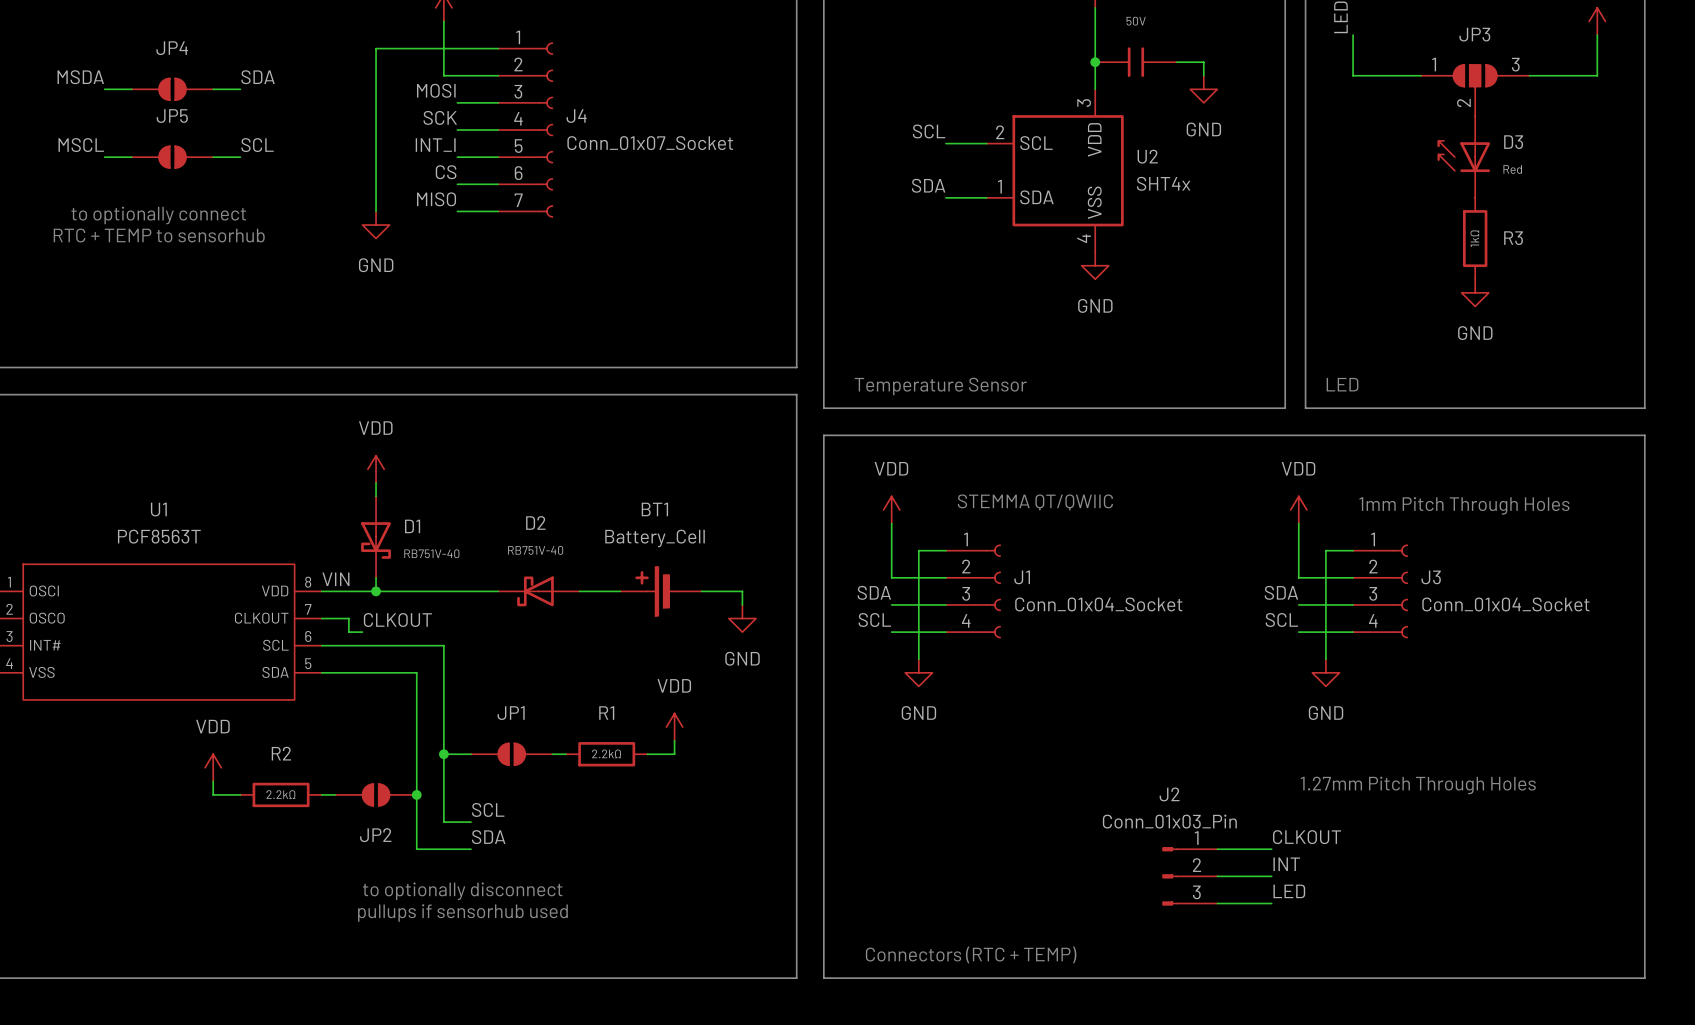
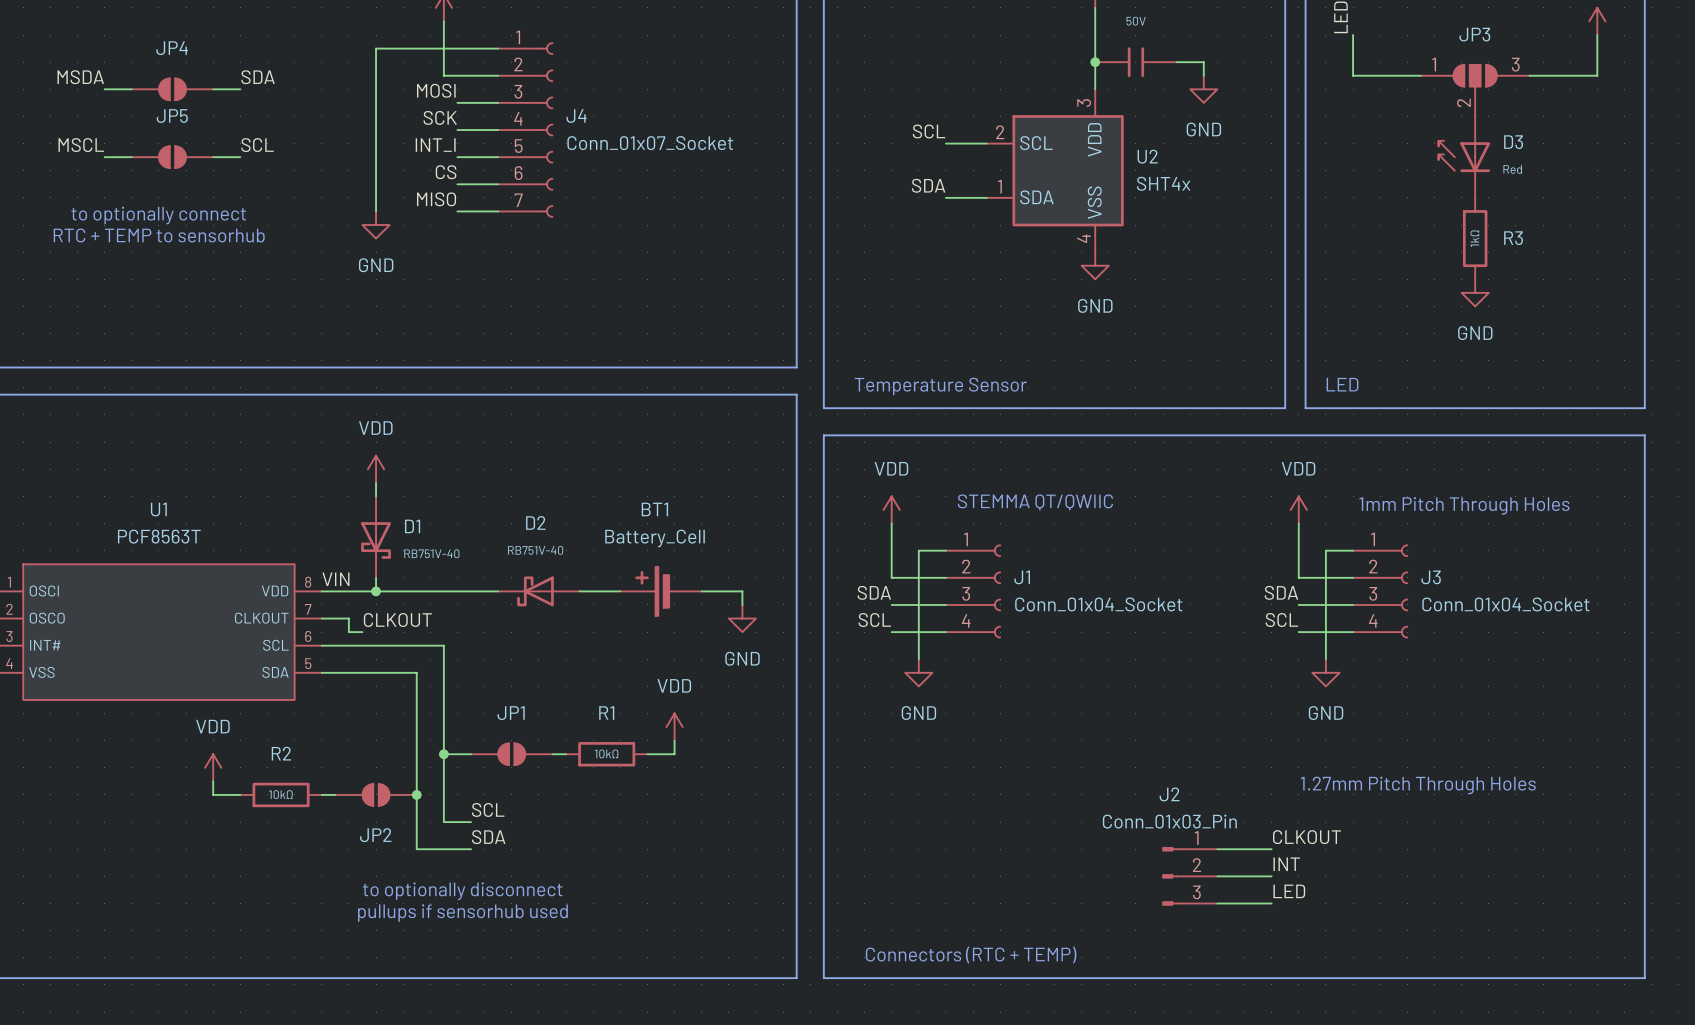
R1 value: 2.2kΩ (606, 753) -> 10kΩ (606, 753)
R2 value: 2.2kΩ (280, 794) -> 10kΩ (280, 794)

